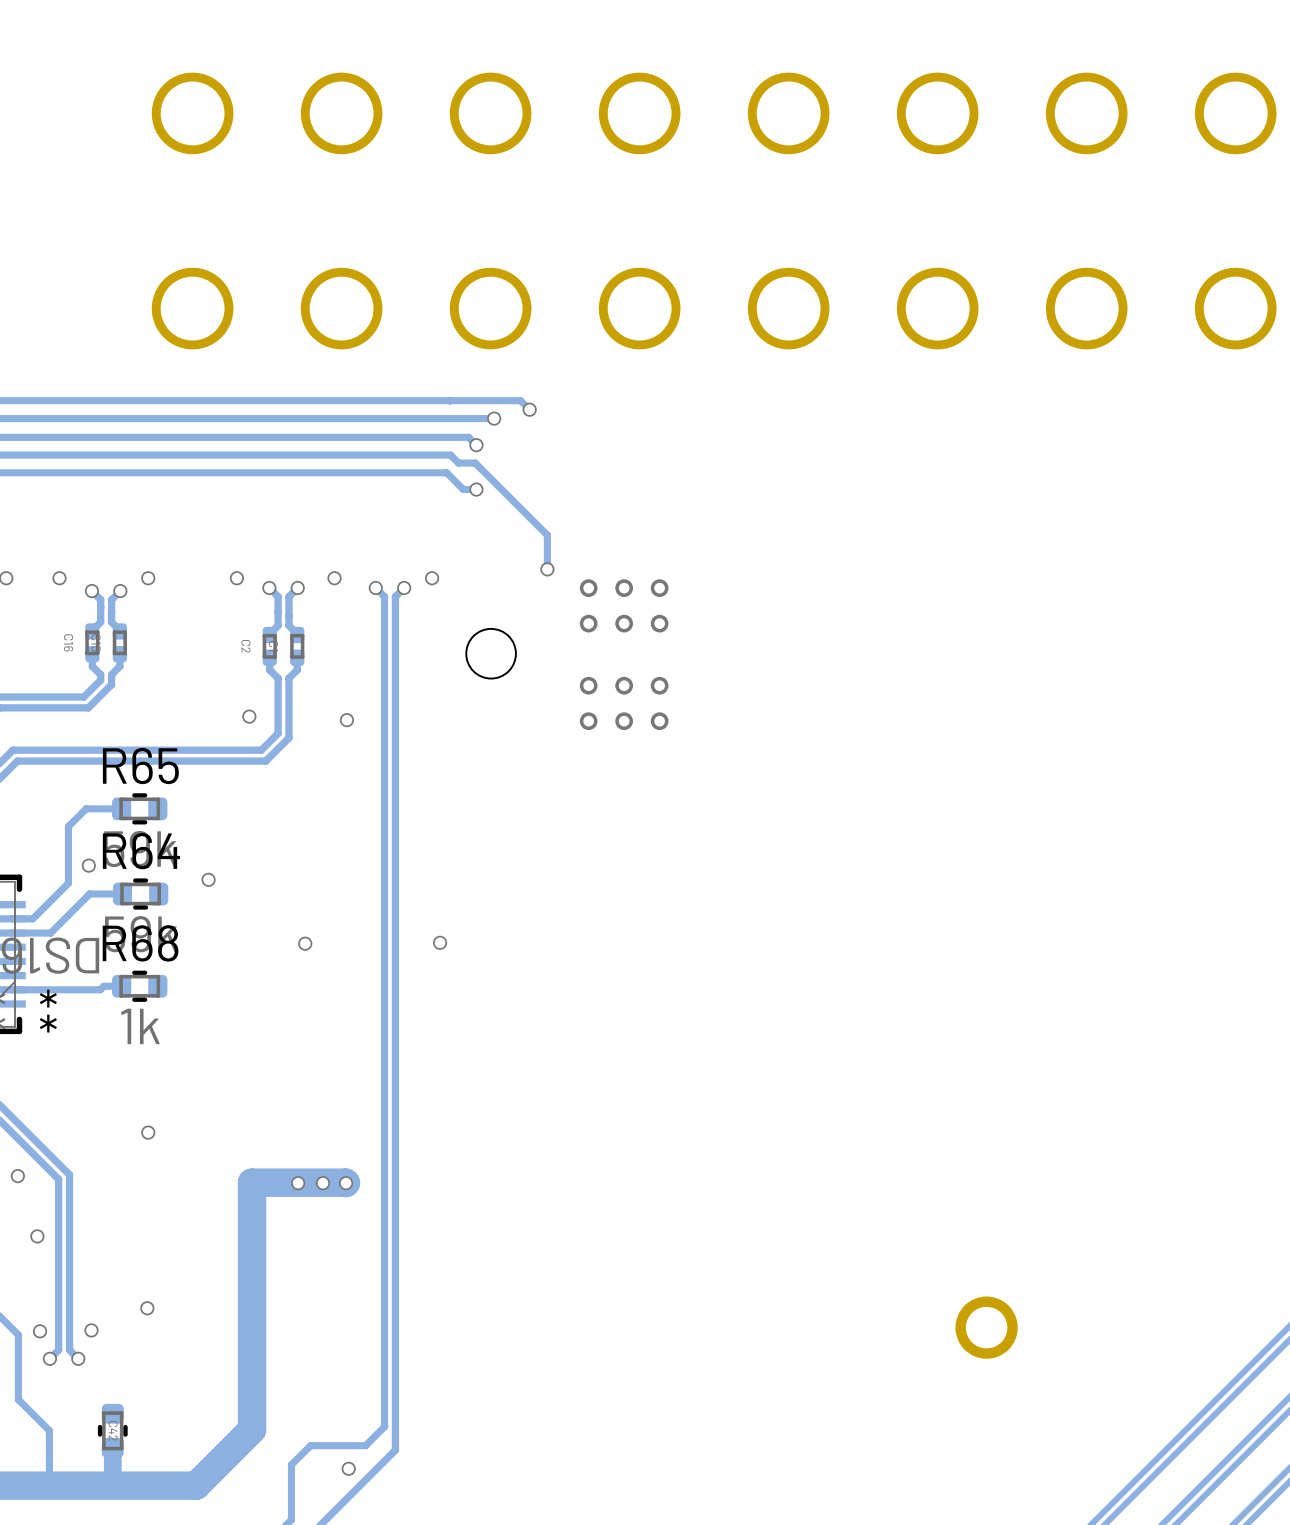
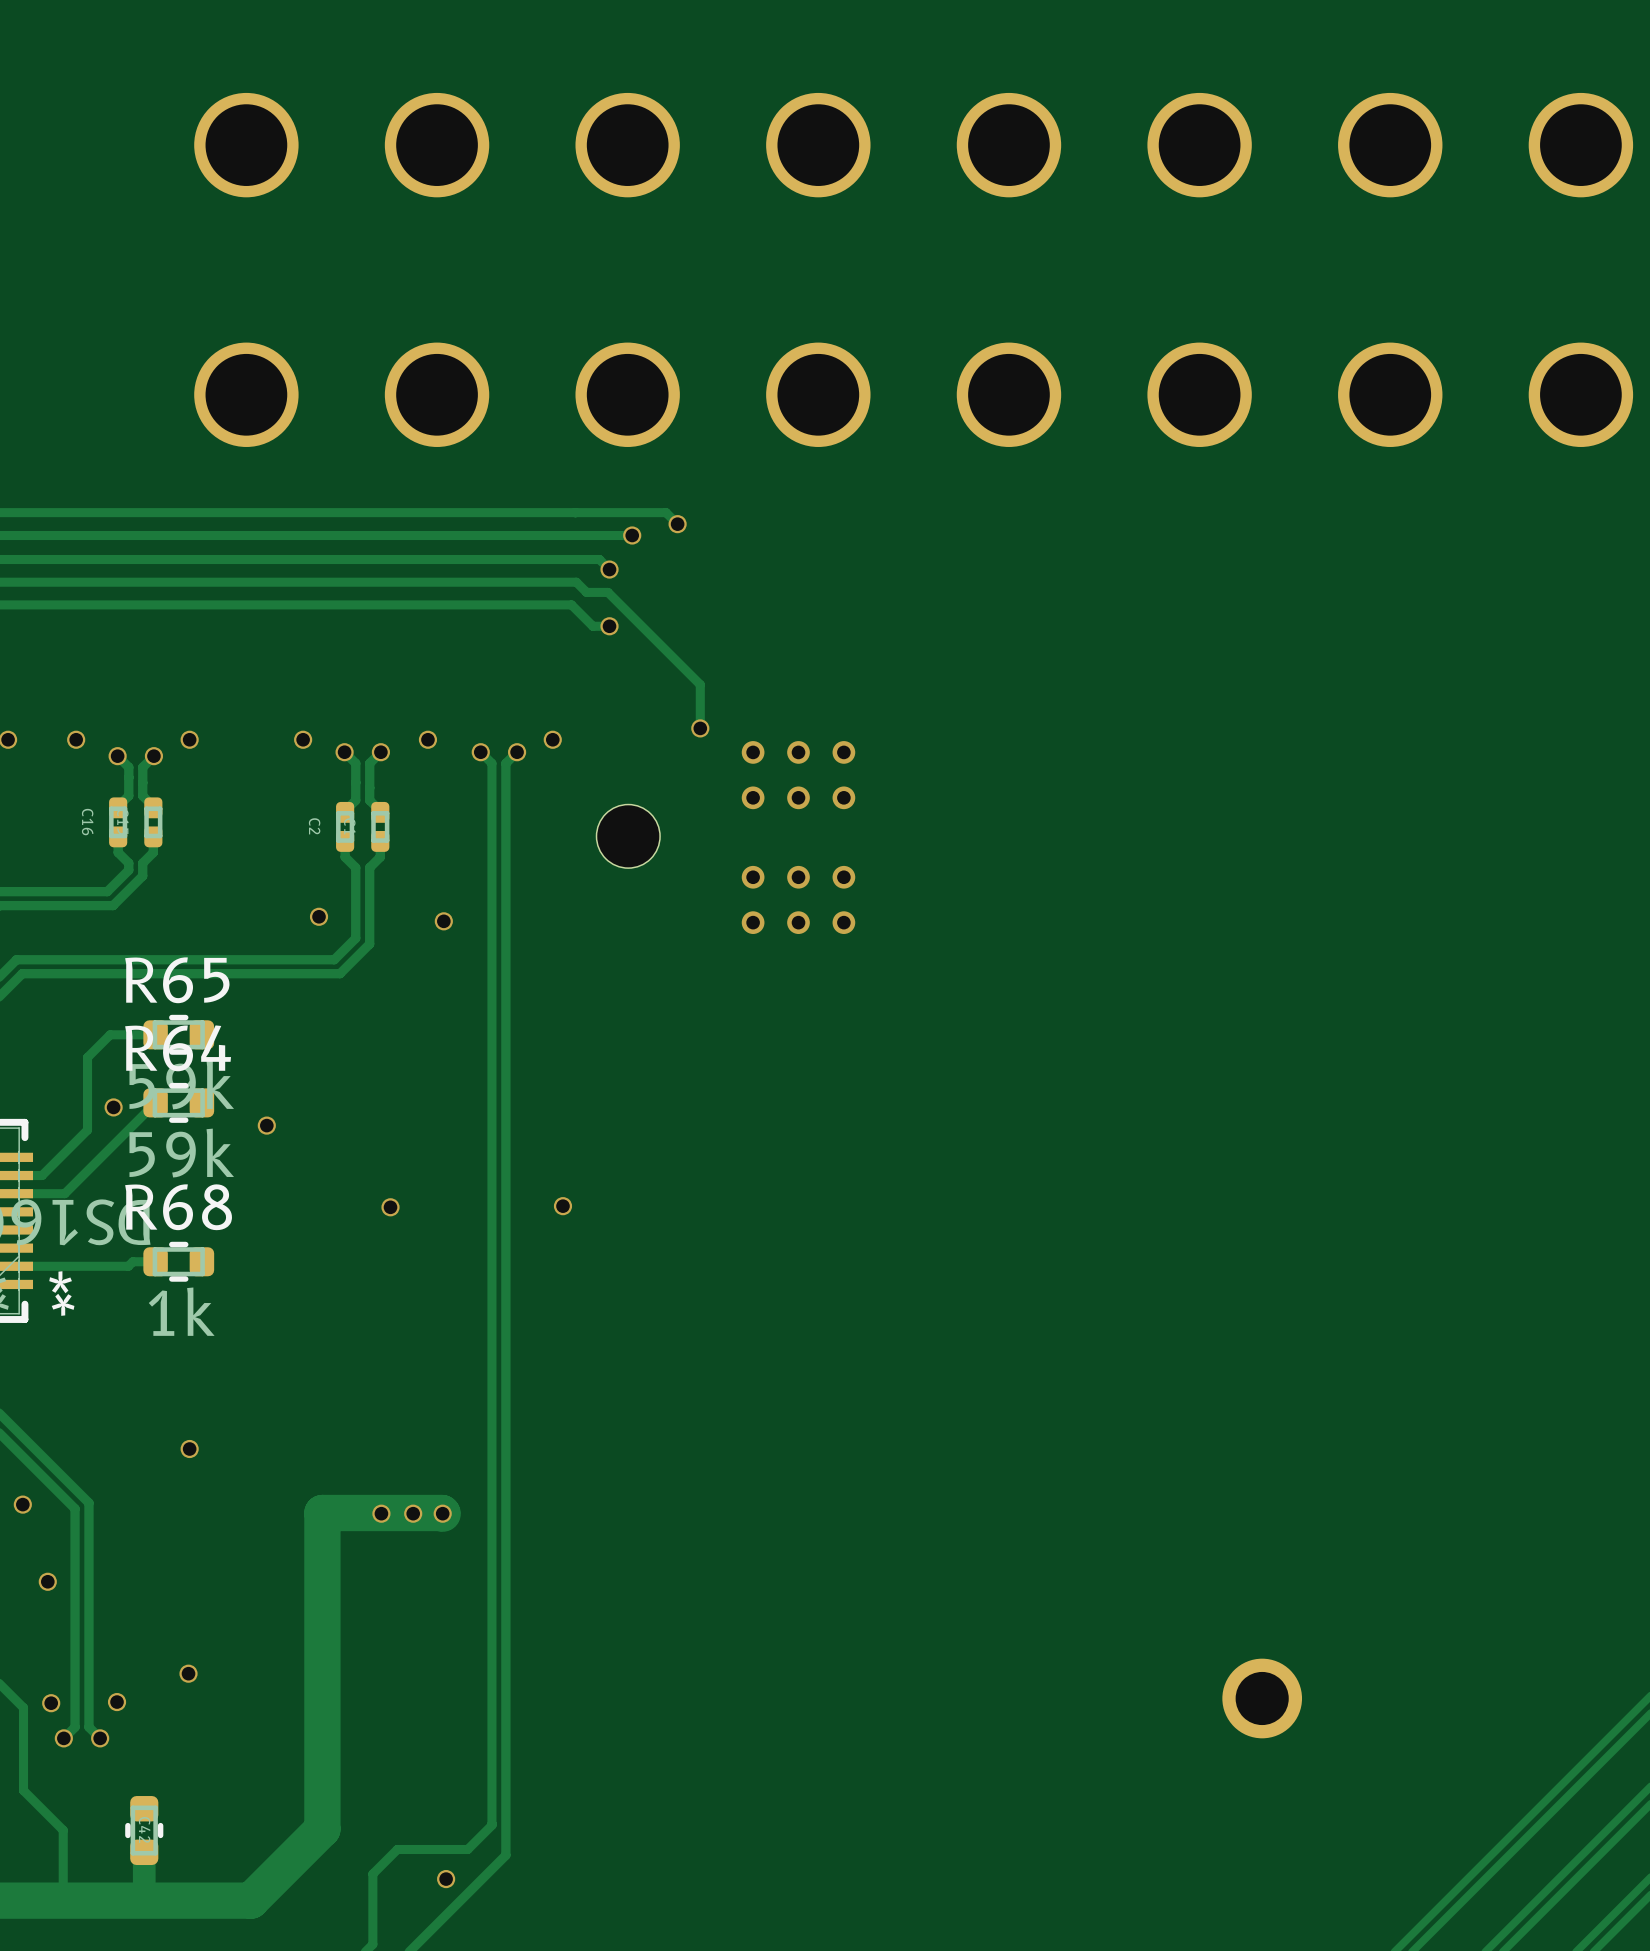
track: (122, 894) (89, 894) -> (155, 1102) (114, 1143)
R64 position: (140, 894) -> (178, 1102)

